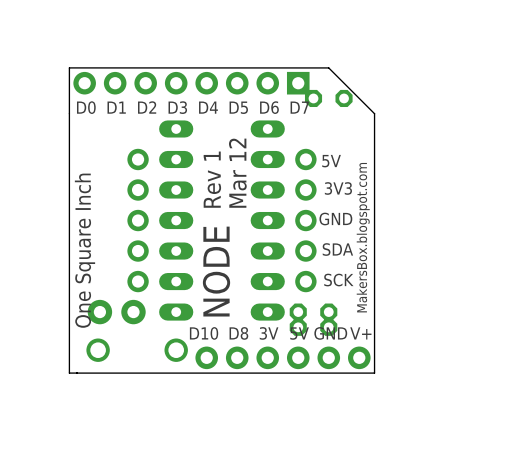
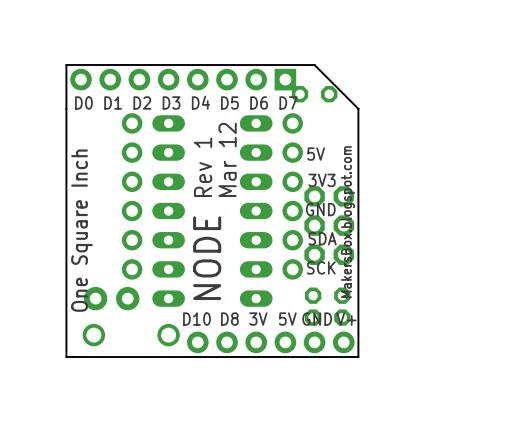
part: none -> (132, 138)
part: none -> (292, 138)
part: none -> (329, 225)
part: none -> (327, 295)
part: (313, 312) -> none
part: (313, 327) -> none
part: none -> (327, 317)

